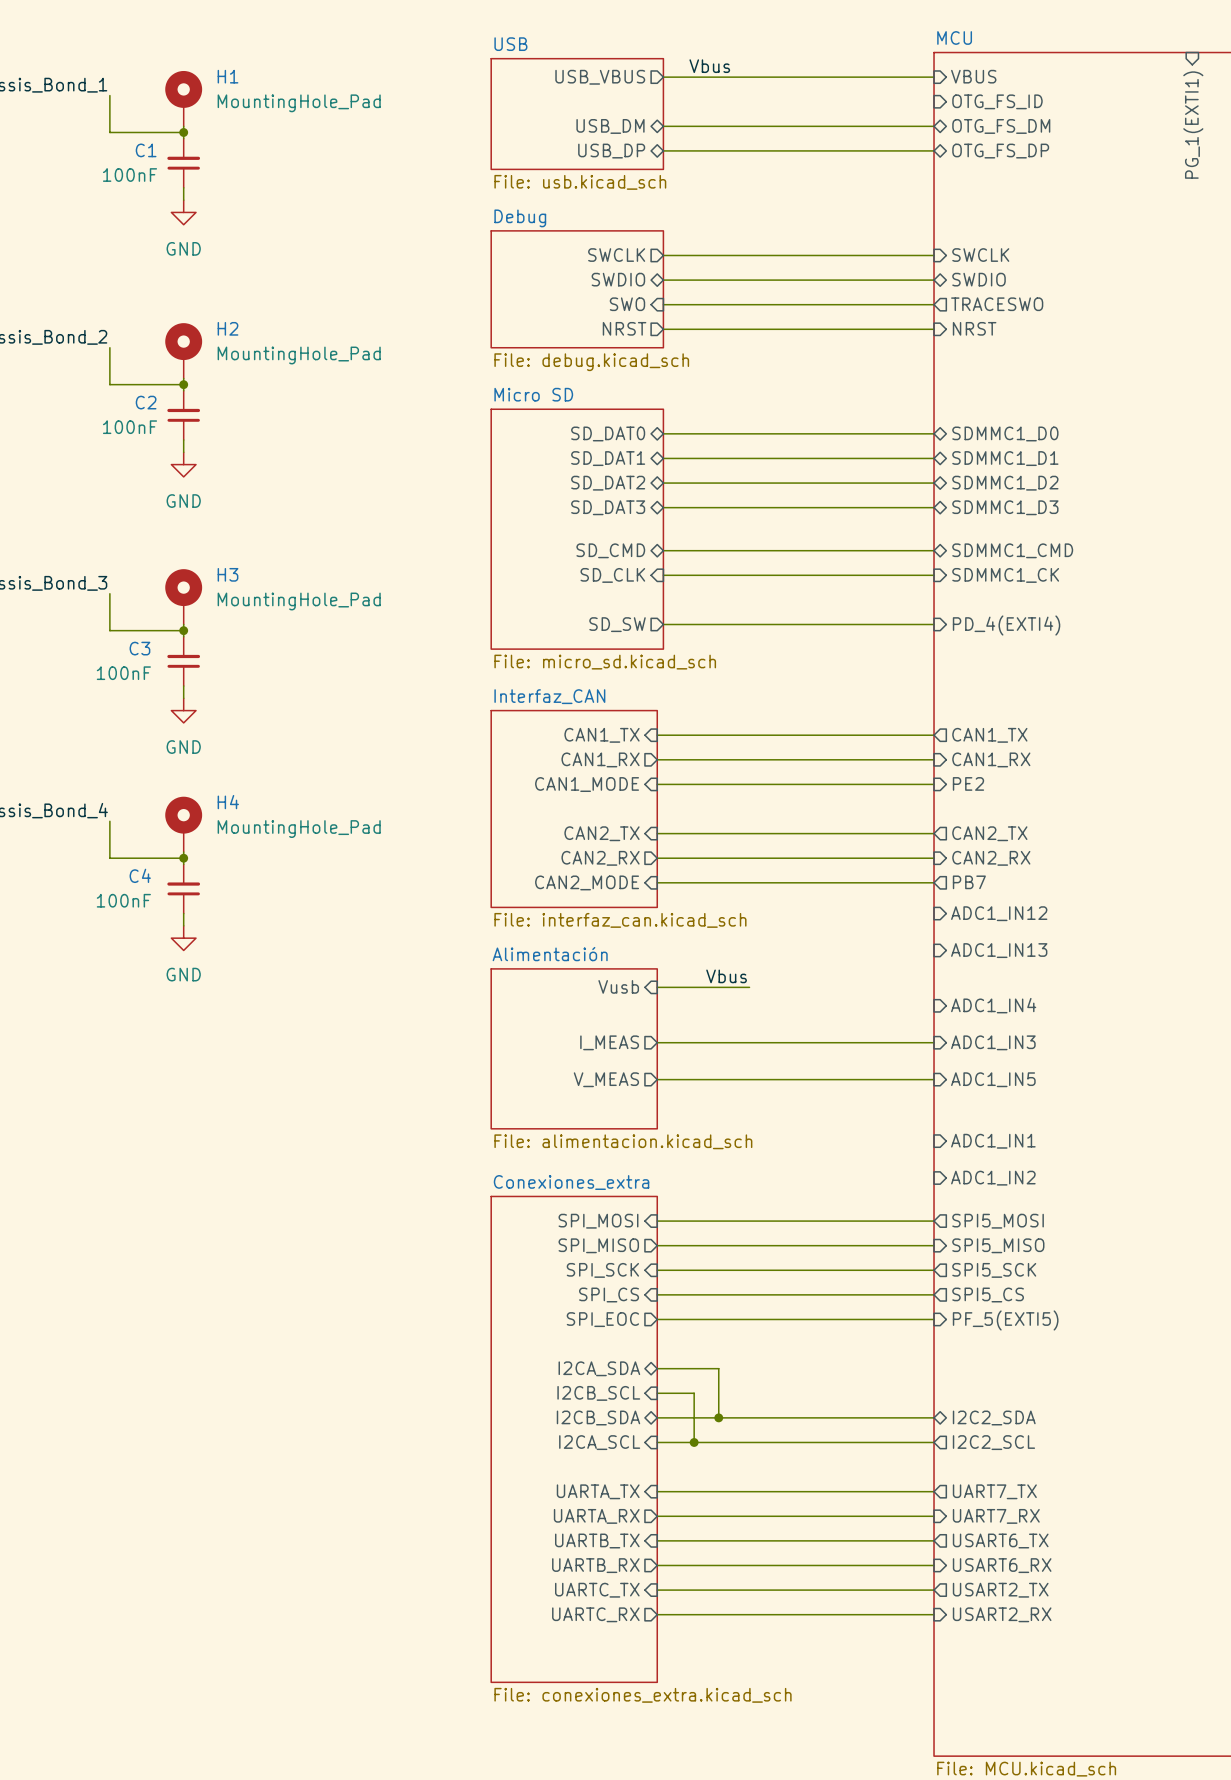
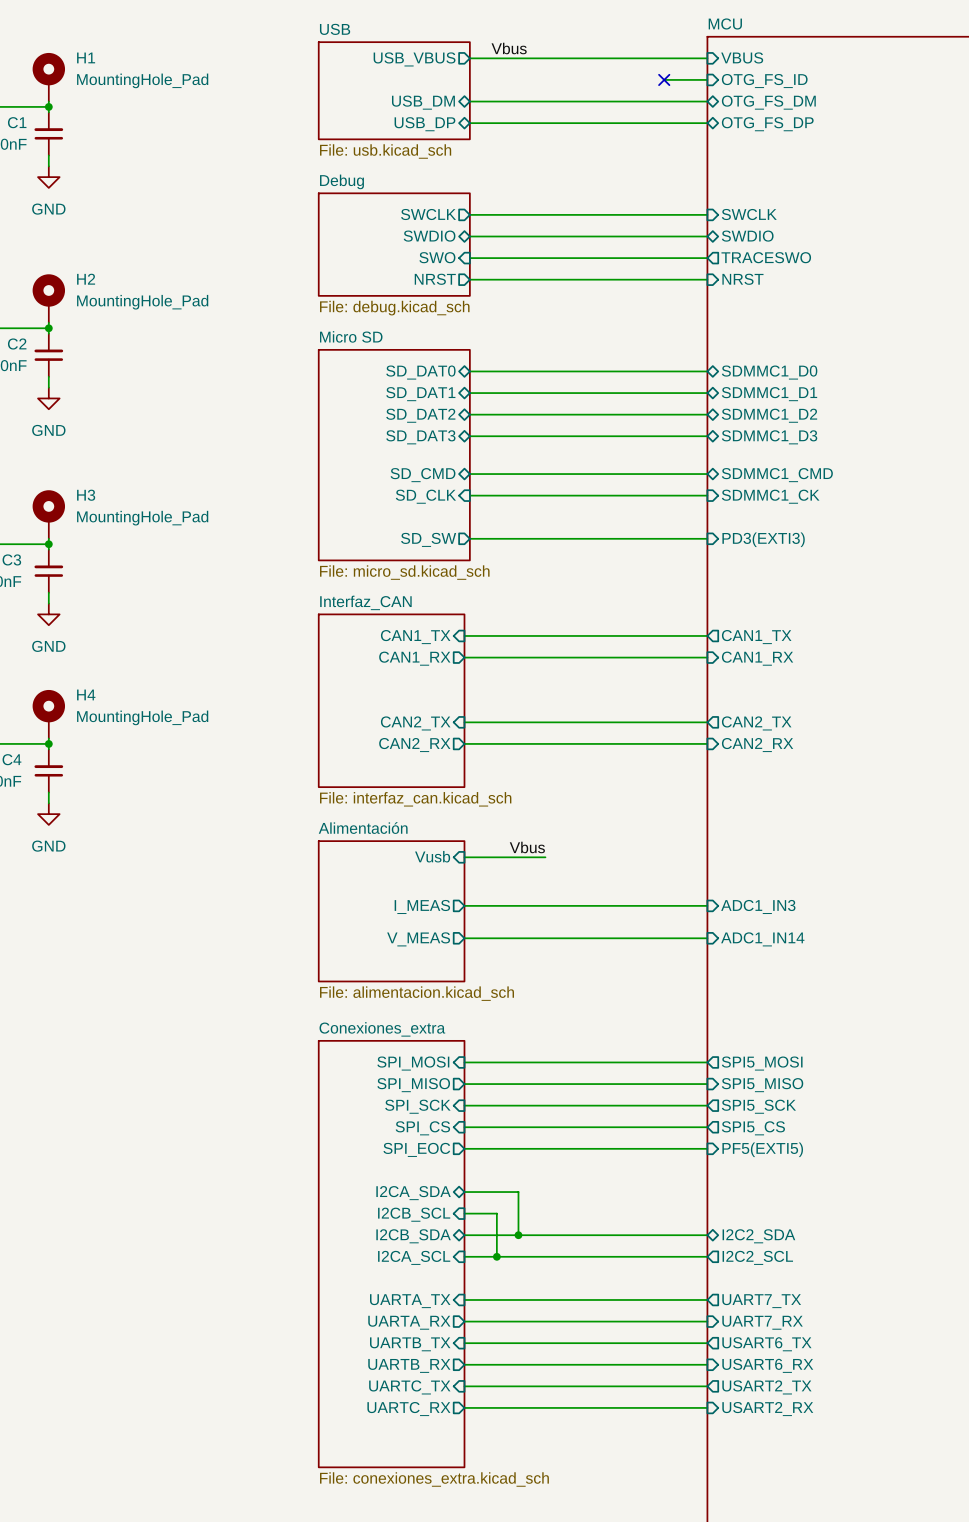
wire: none -> (664, 79) (707, 79)
no-connect mark: none -> (664, 79)
sheet pin: PG_1(EXTI1) (1193, 125) -> none
sheet pin: PD_4(EXTI4) (1006, 625) -> PD3(EXTI3) (763, 539)
sheet pin: PE2 (968, 783) -> none
sheet pin: CAN1_MODE (587, 784) -> none
wire: (657, 784) (934, 784) -> none
sheet pin: CAN2_MODE (587, 882) -> none
wire: (657, 882) (934, 882) -> none
sheet pin: PB7 (969, 882) -> none
sheet pin: ADC1_IN12 (999, 913) -> none
sheet pin: ADC1_IN13 (999, 950) -> none
sheet pin: ADC1_IN4 (993, 1005) -> none
sheet pin: ADC1_IN5 (993, 1079) -> ADC1_IN14 (762, 939)
sheet pin: ADC1_IN1 (993, 1141) -> none
sheet pin: ADC1_IN2 (993, 1178) -> none
sheet pin: PF_5(EXTI5) (1005, 1320) -> PF5(EXTI5) (762, 1149)

